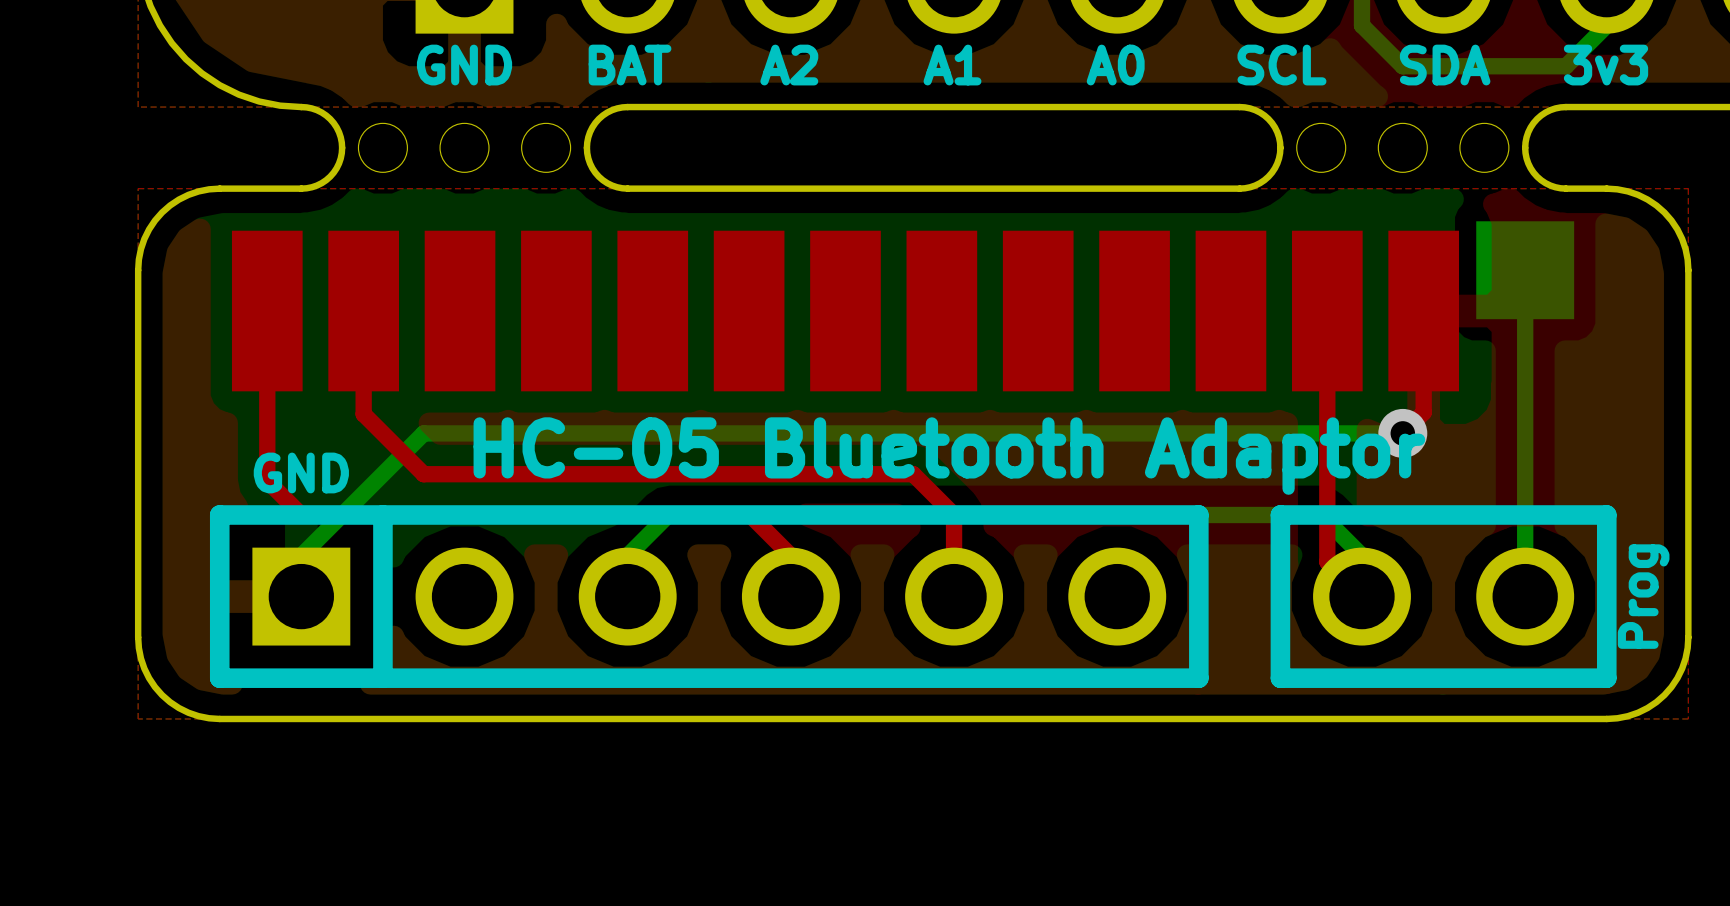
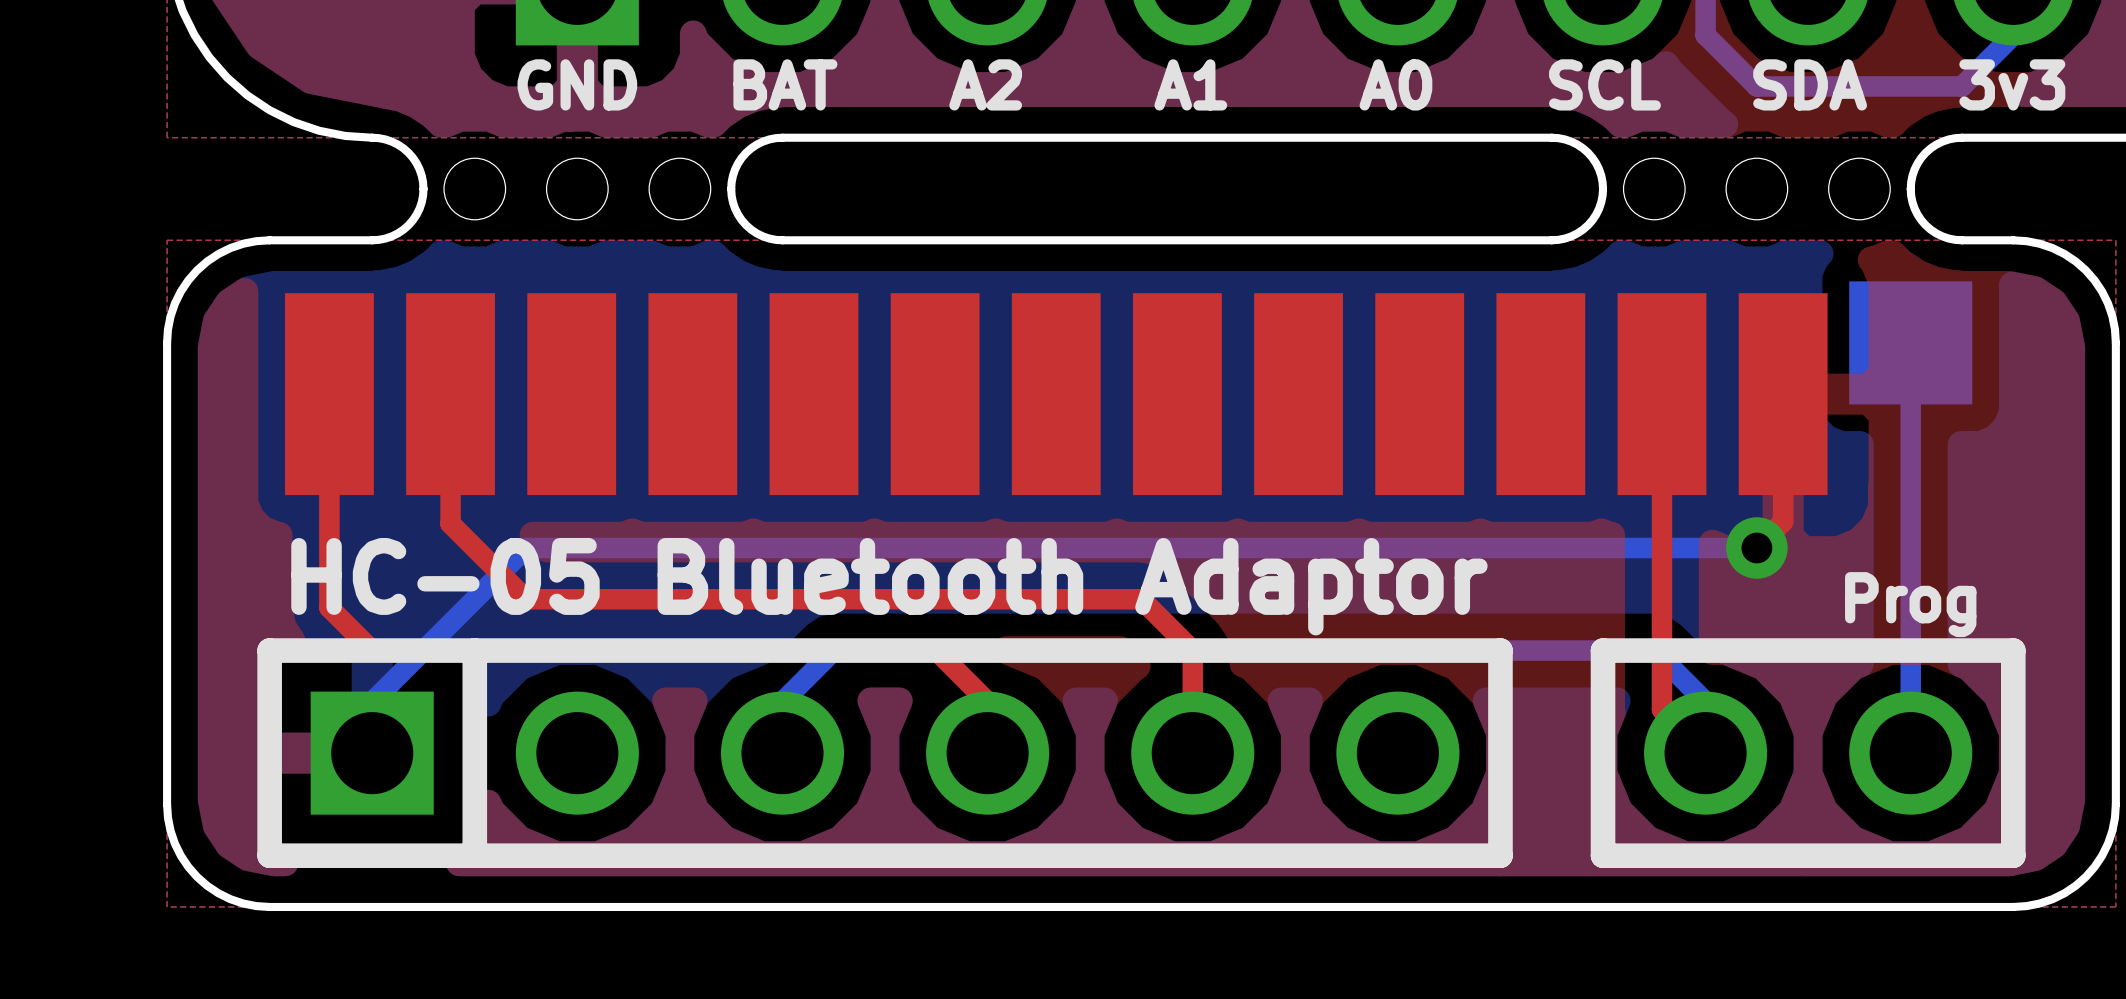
text position: HC-05 Bluetooth Adaptor (949, 456) -> HC-05 Bluetooth Adaptor (889, 586)
text: GND (301, 472) -> none
text rotation: 0° (1643, 596) -> 90° clockwise (1910, 604)
text position: Prog (1643, 596) -> Prog (1910, 604)

